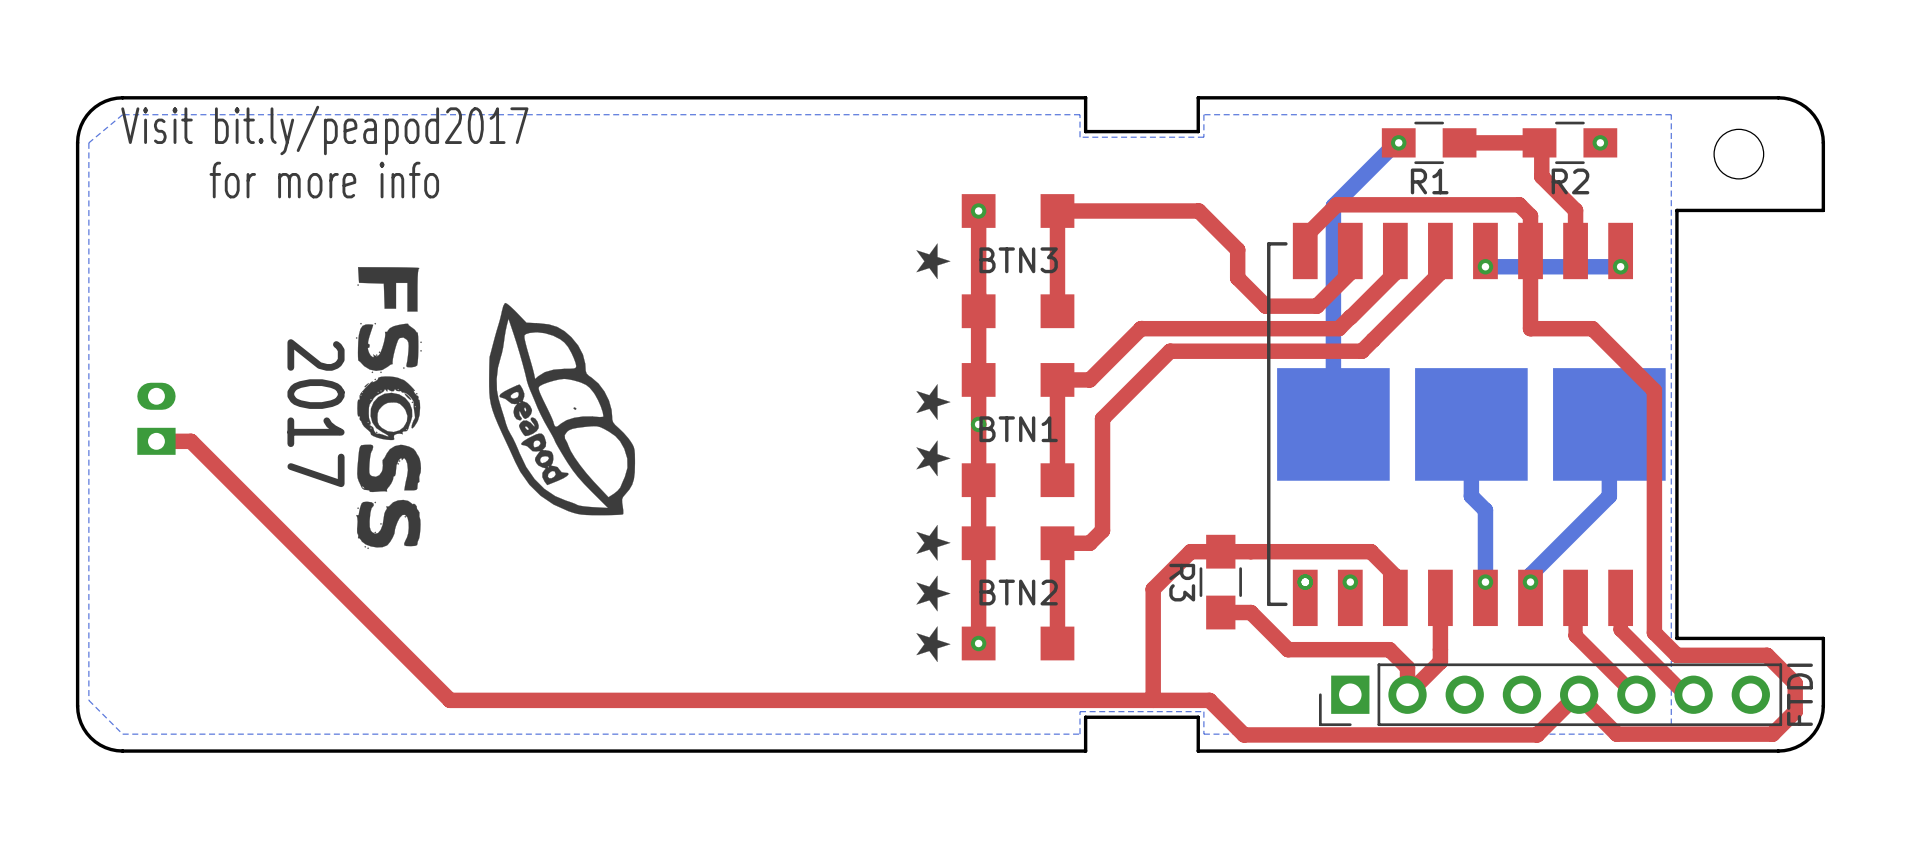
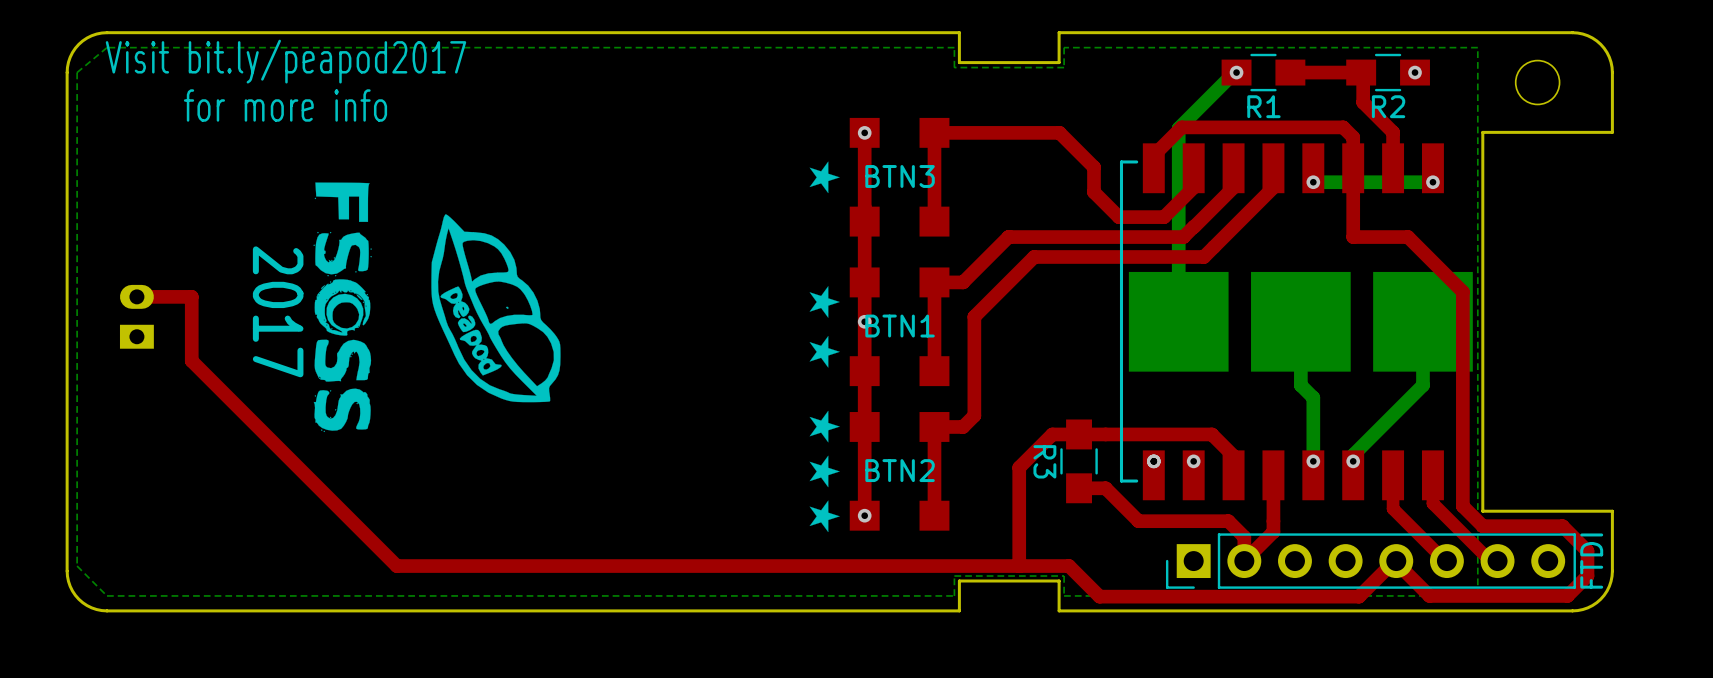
top track: (156, 441) (191, 441) (218, 468) -> (136, 296) (191, 296) (191, 360)

